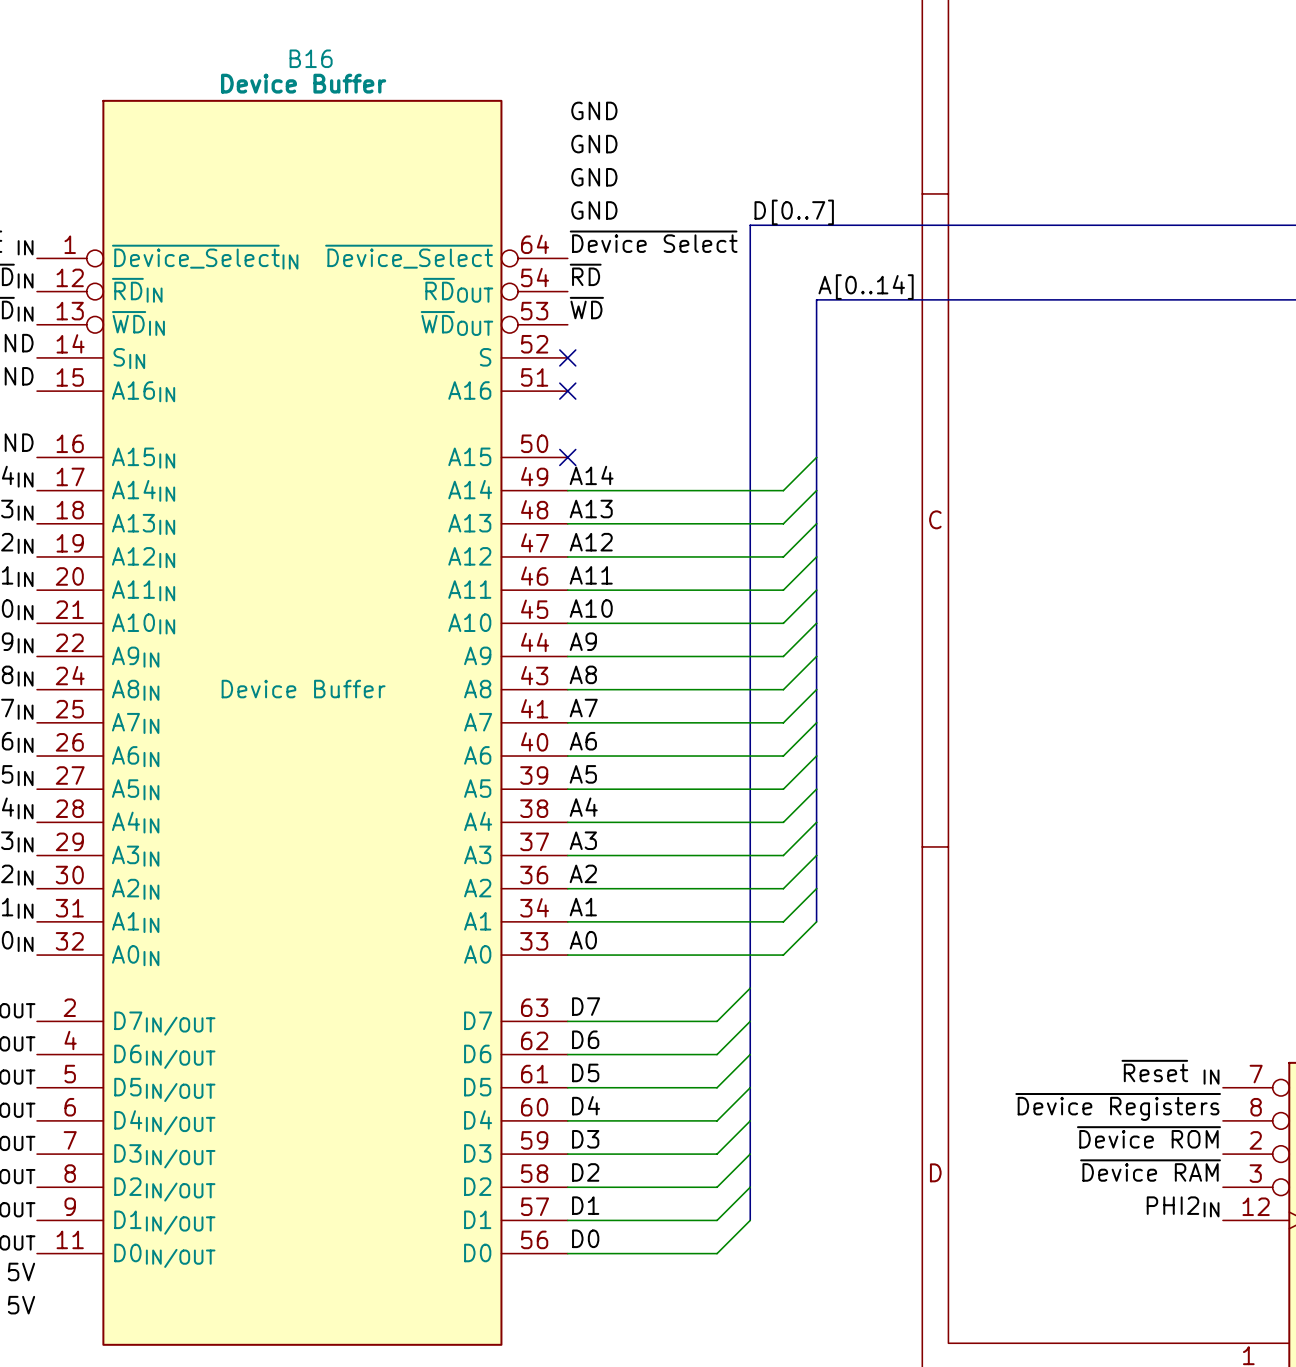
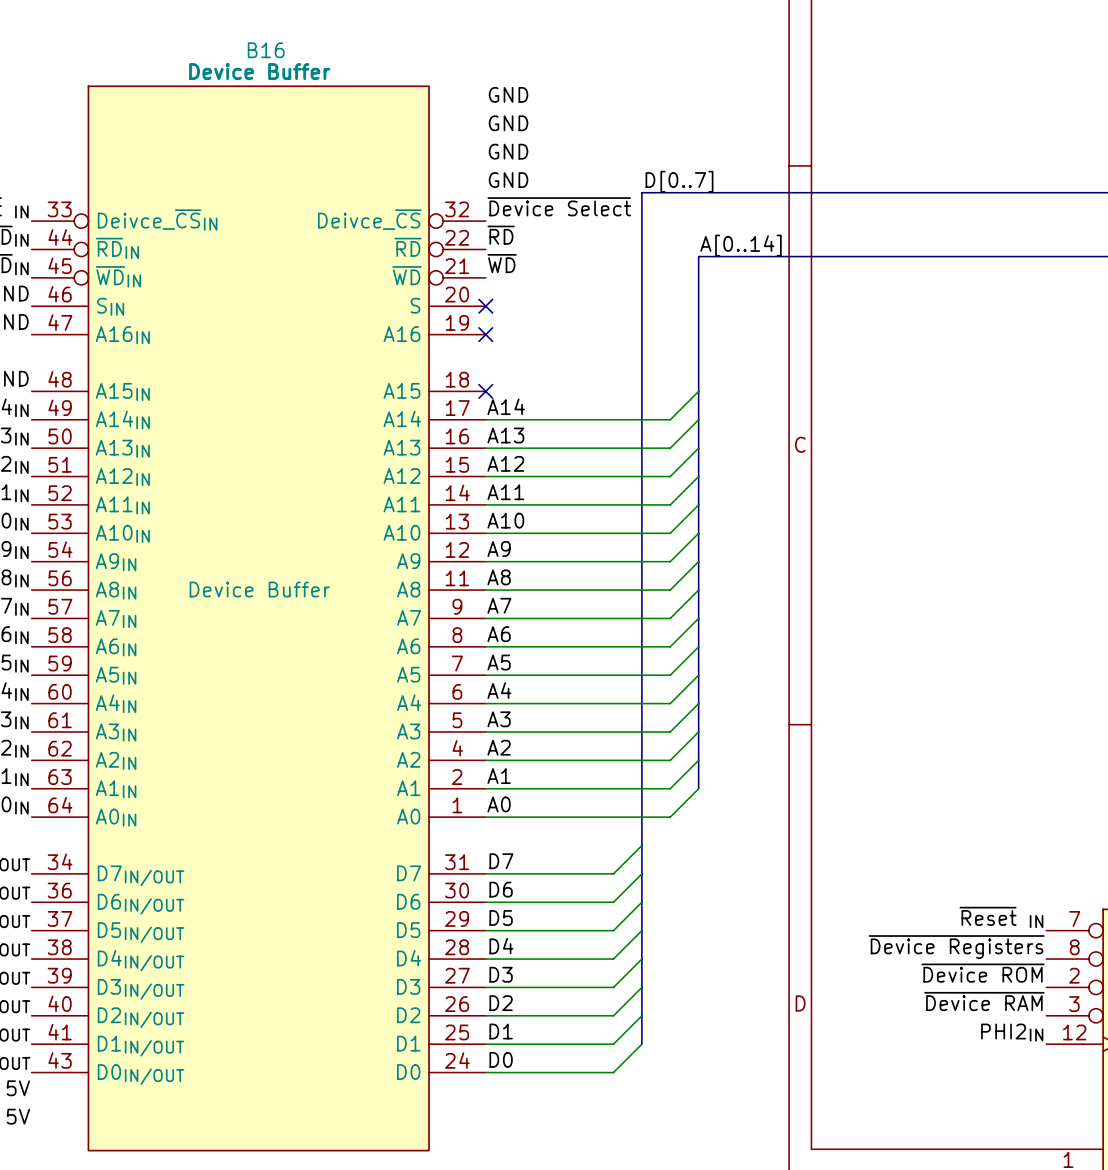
B16 symbol: [37, 99, 568, 1346] -> [31, 85, 486, 1152]

